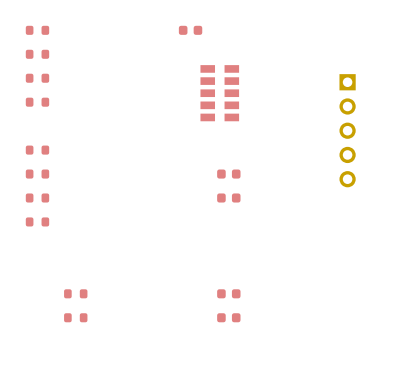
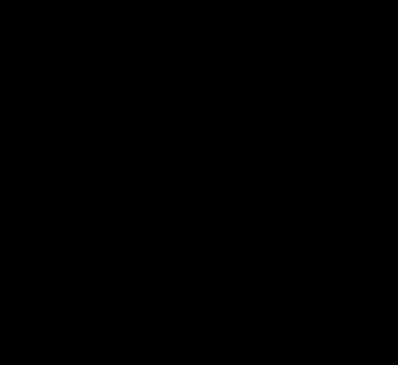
part: (37, 30) -> none
part: (190, 30) -> none
part: (37, 54) -> none
part: (37, 78) -> none
part: (207, 93) -> none
part: (231, 93) -> none
part: (37, 102) -> none
part: (347, 130) -> none
part: (37, 150) -> none
part: (37, 174) -> none
part: (228, 174) -> none
part: (37, 198) -> none
part: (228, 198) -> none
part: (37, 221) -> none
part: (75, 293) -> none
part: (228, 293) -> none
part: (75, 317) -> none
part: (228, 317) -> none

